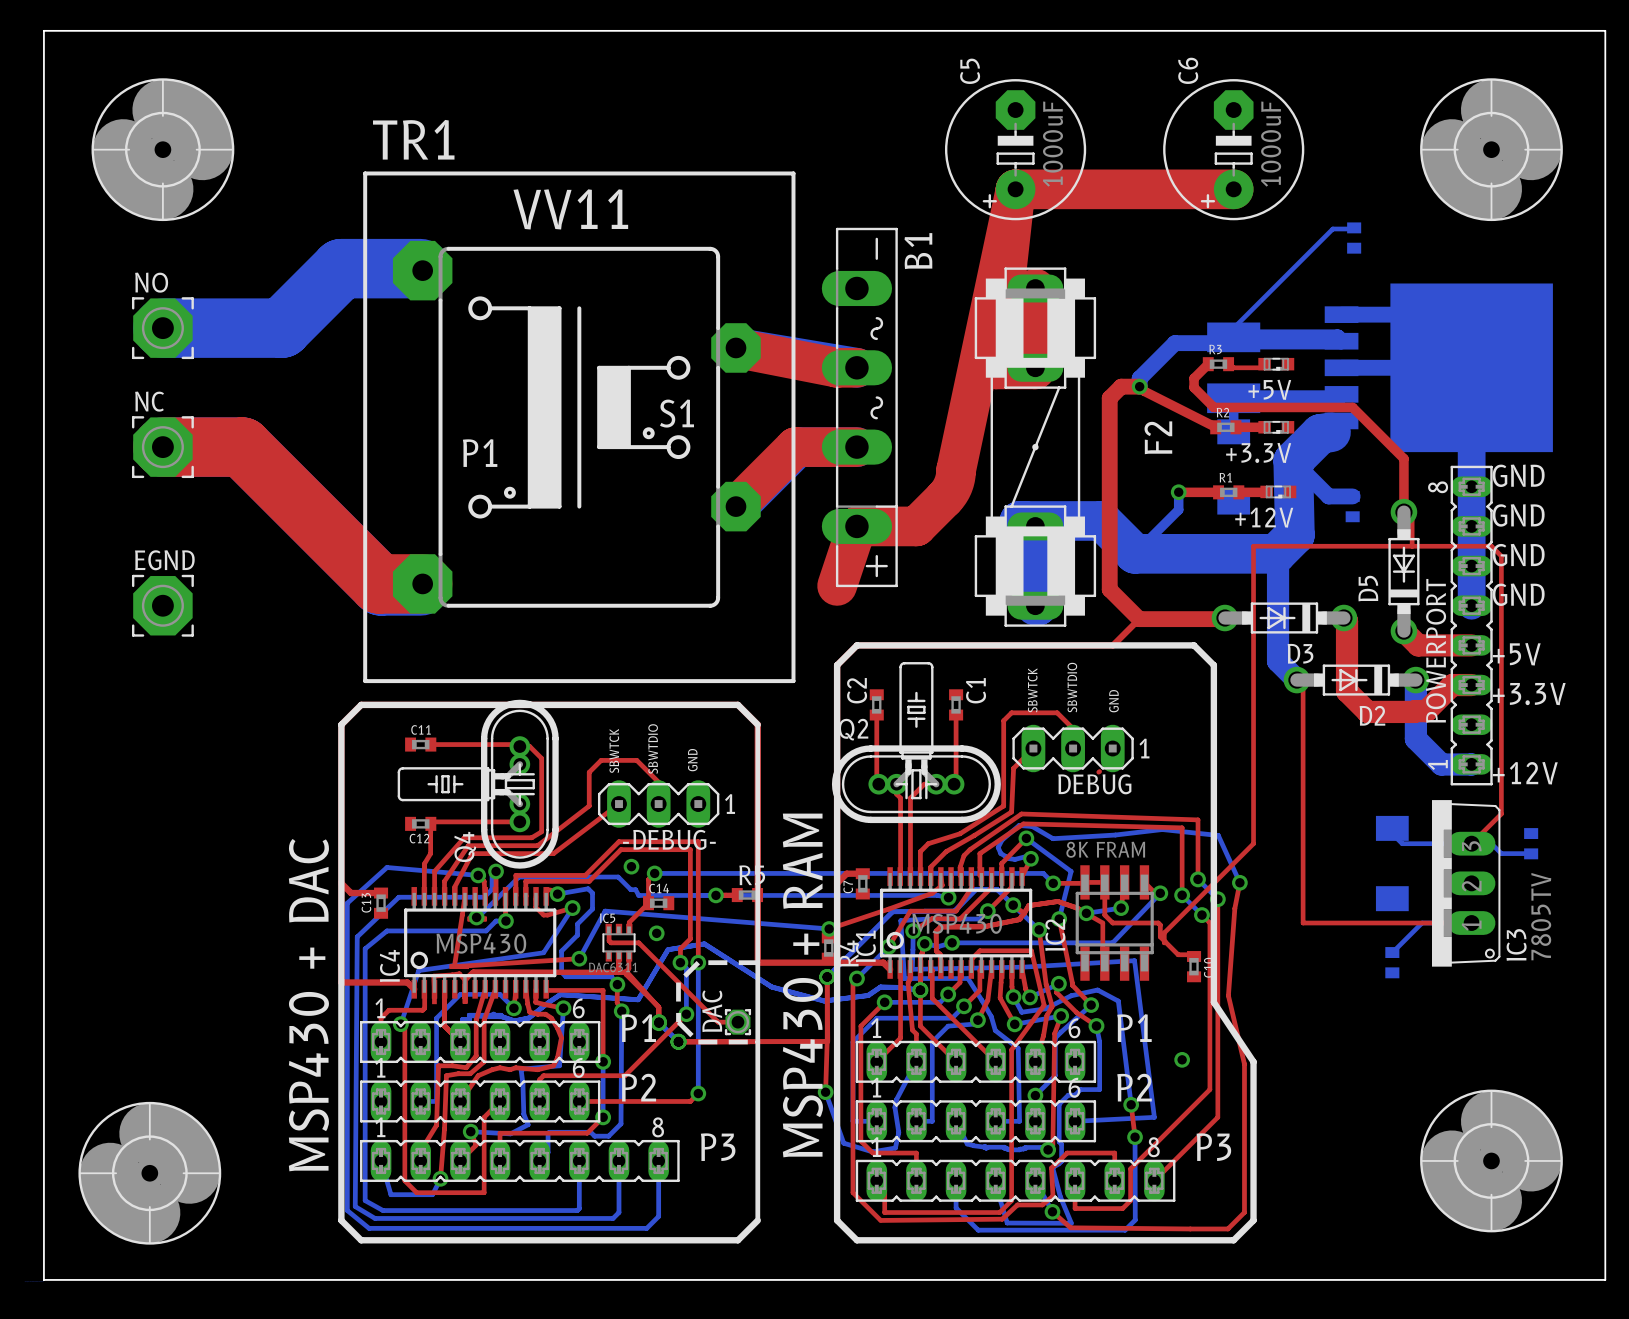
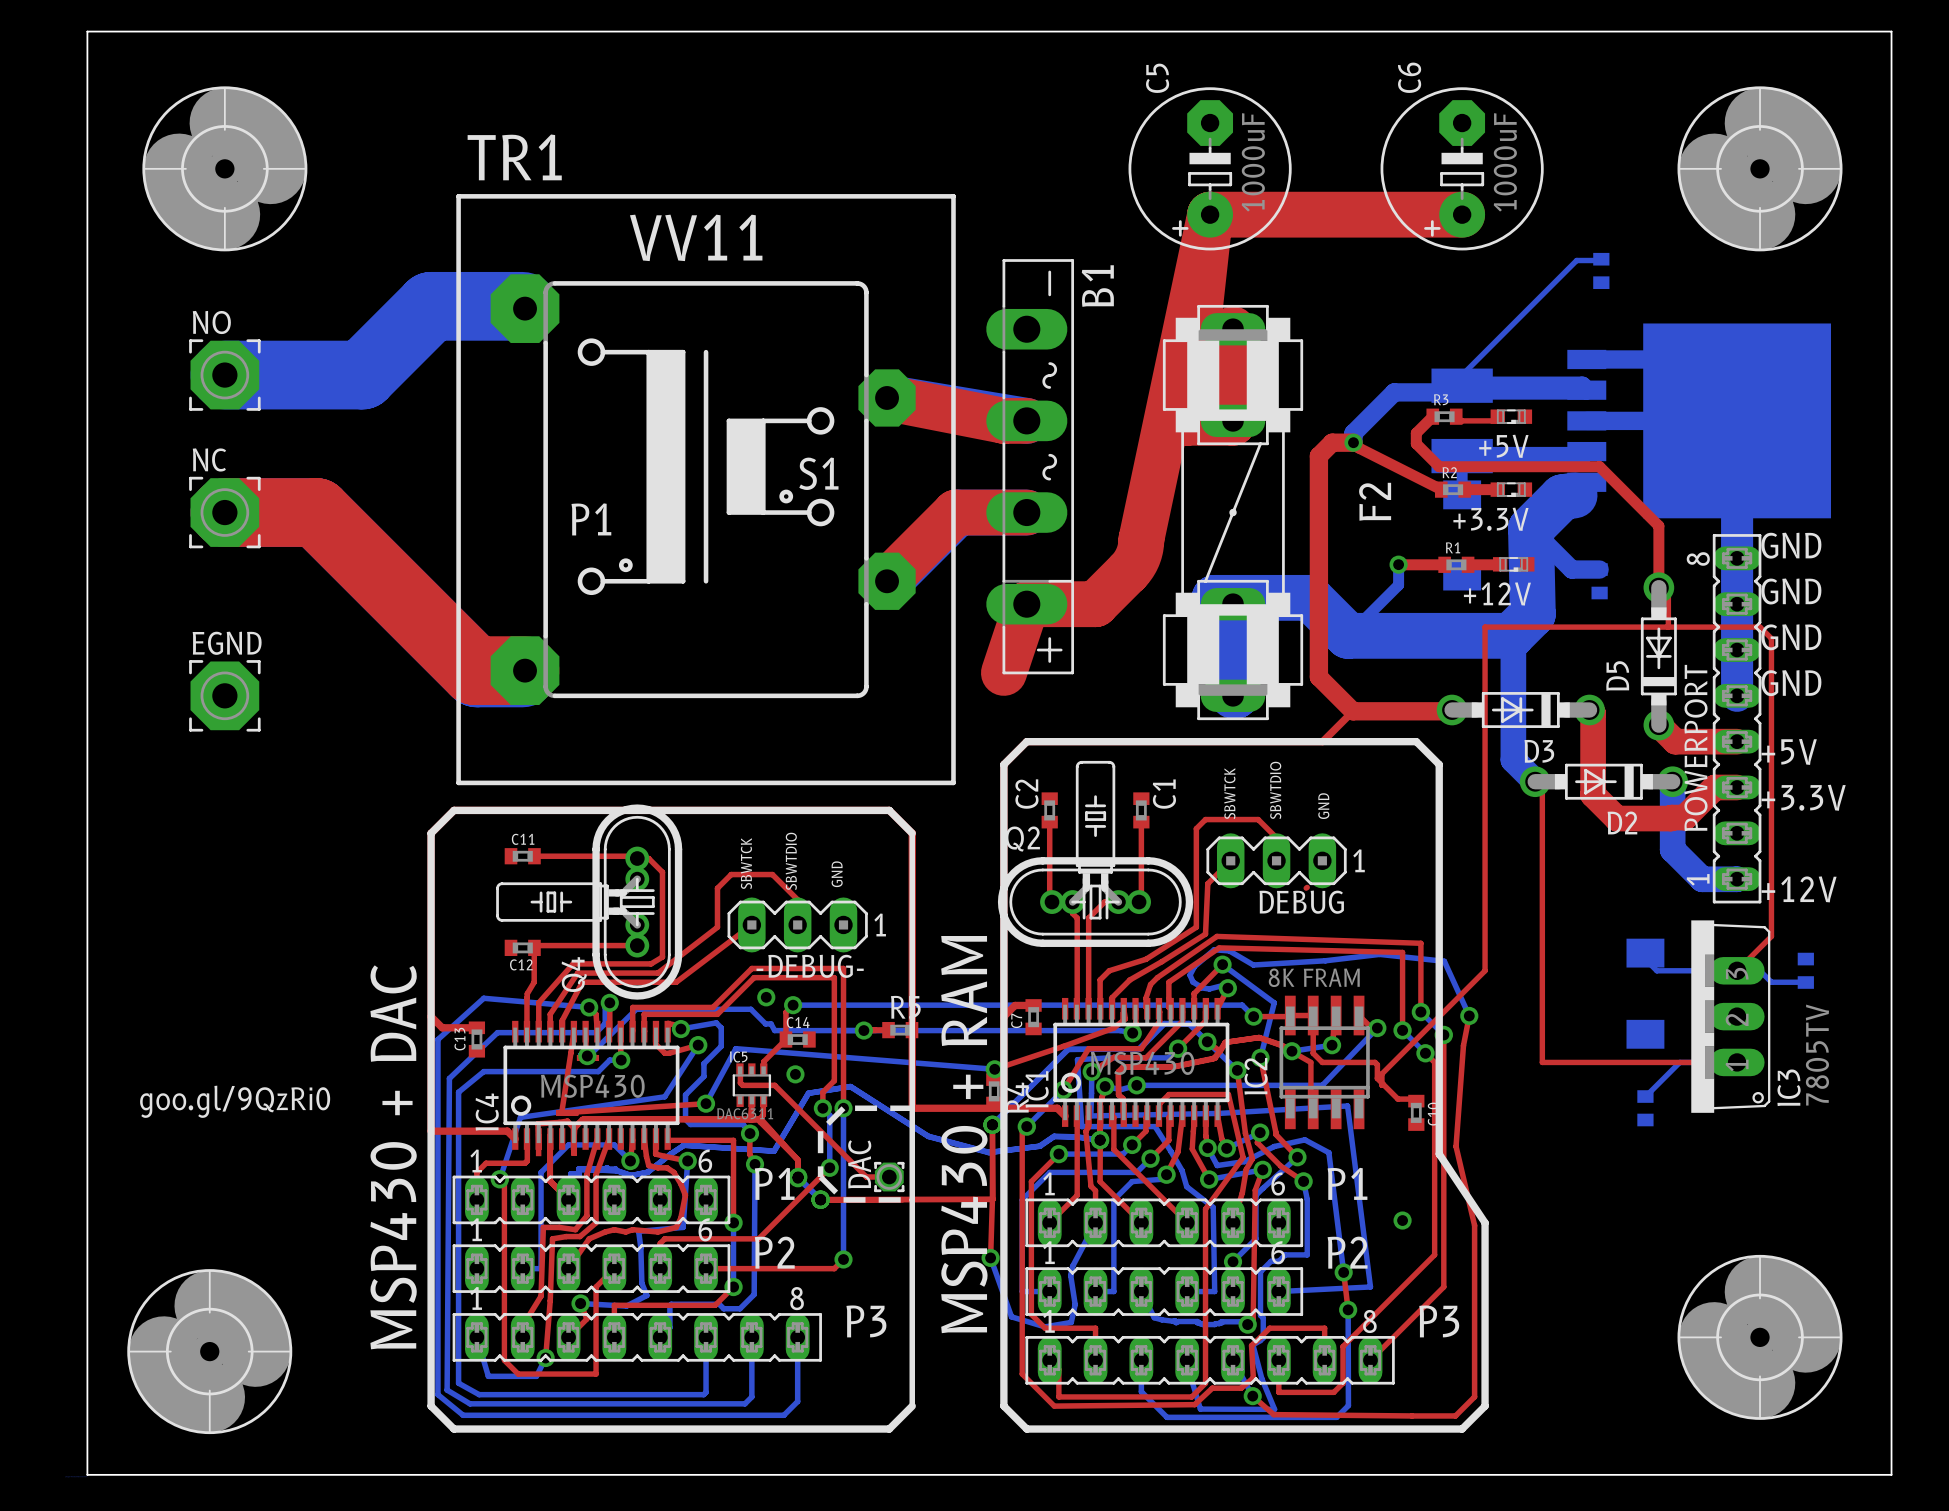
text: none -> goo.gl/9QzRi0 (235, 1101)

